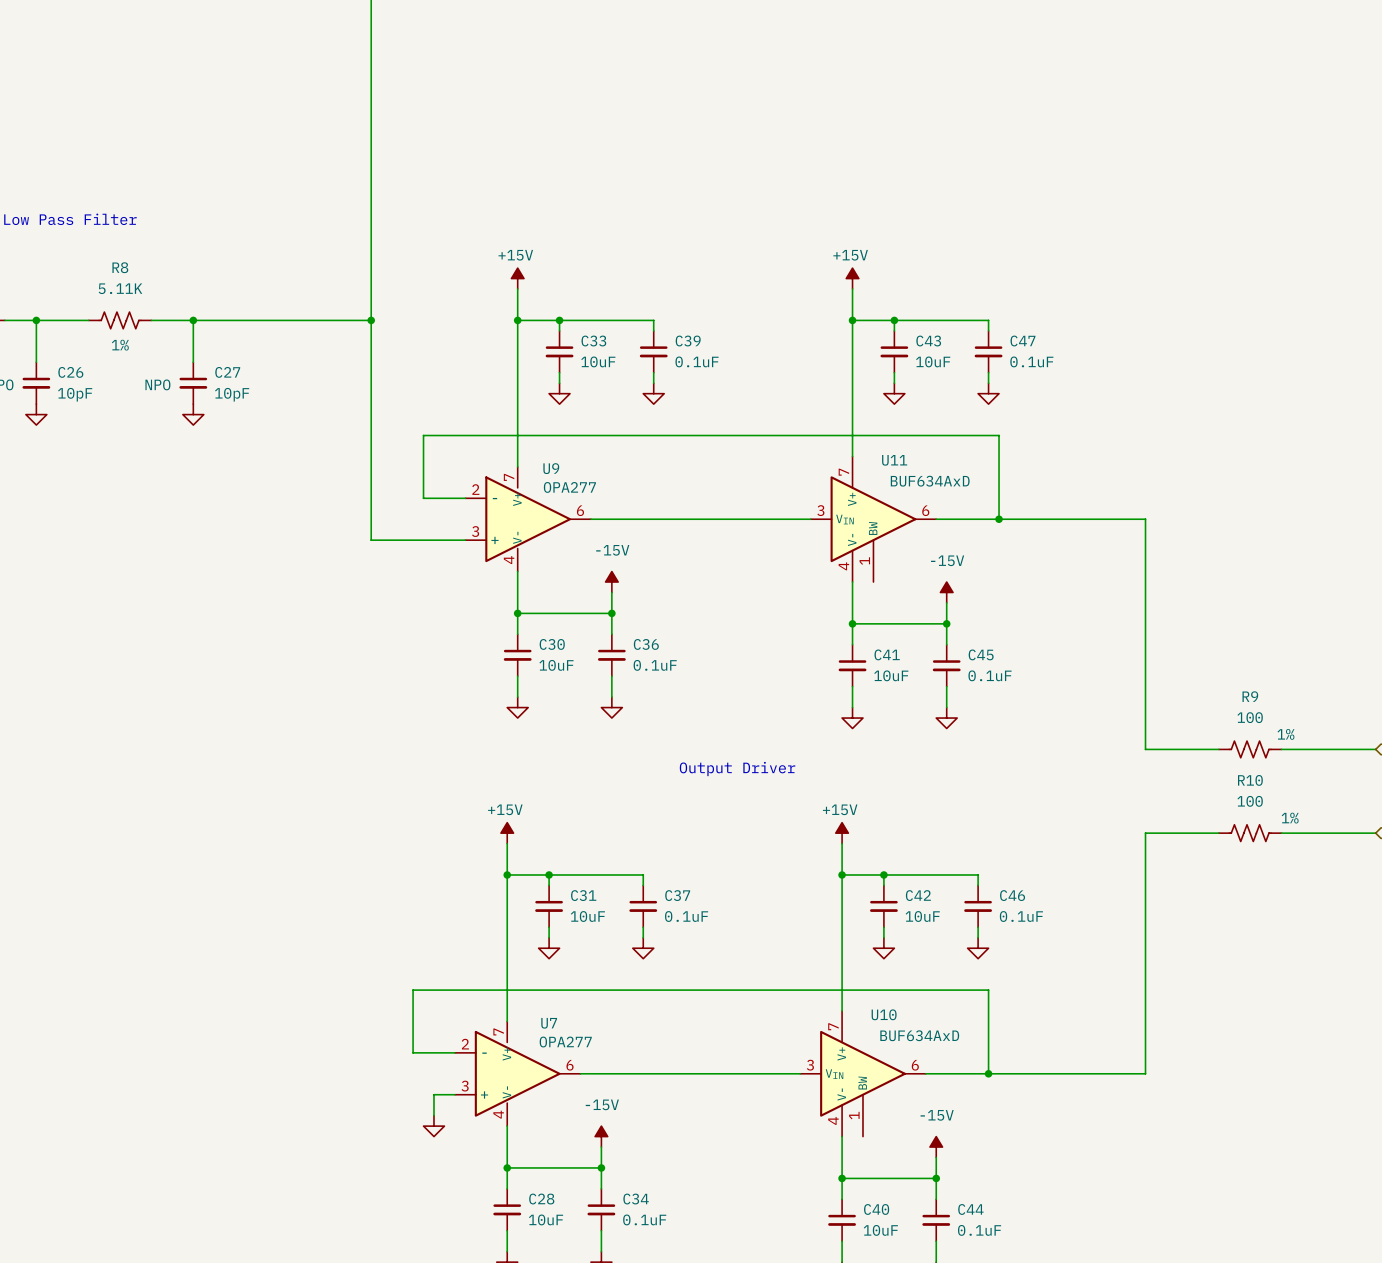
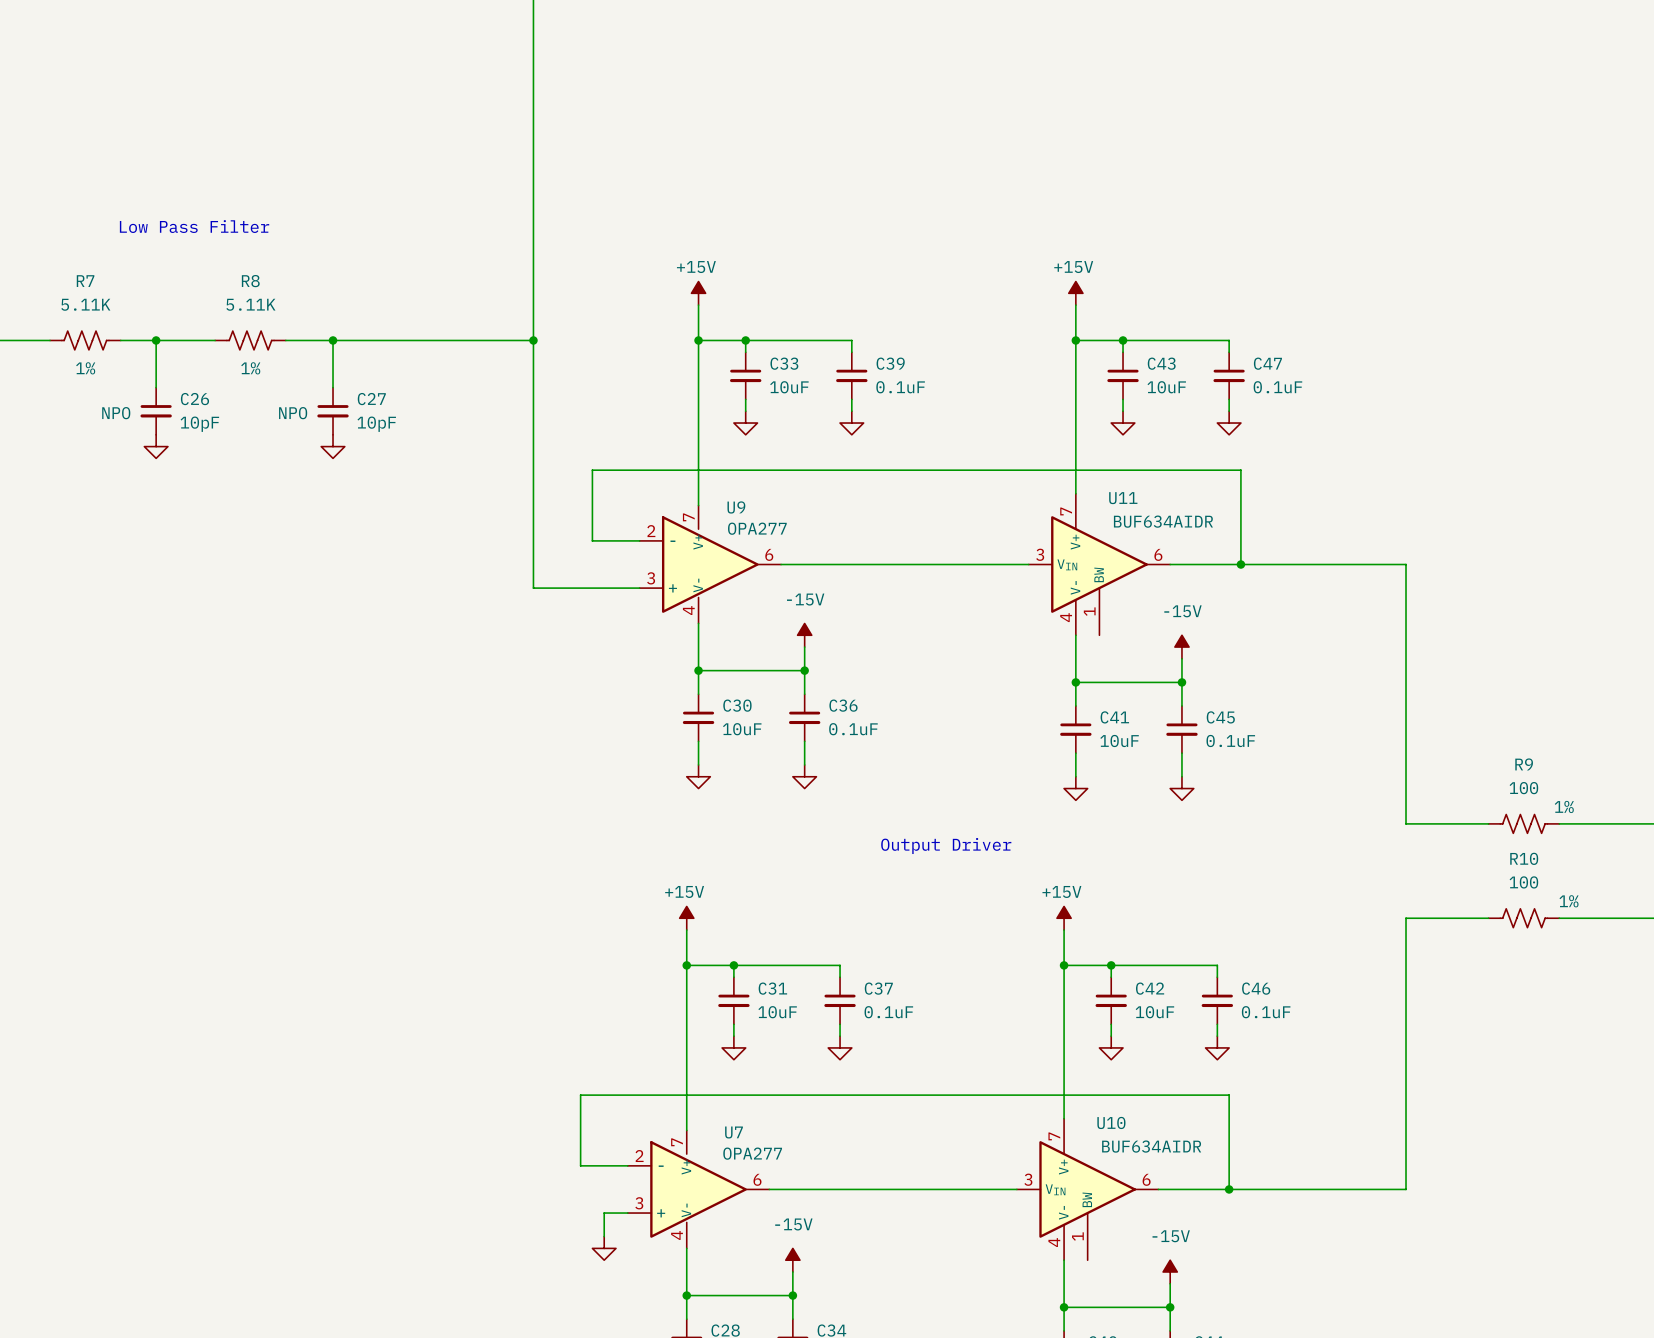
U11 value: BUF634AxD (930, 481) -> BUF634AIDR (1163, 521)
U10 value: BUF634AxD (919, 1035) -> BUF634AIDR (1151, 1146)

